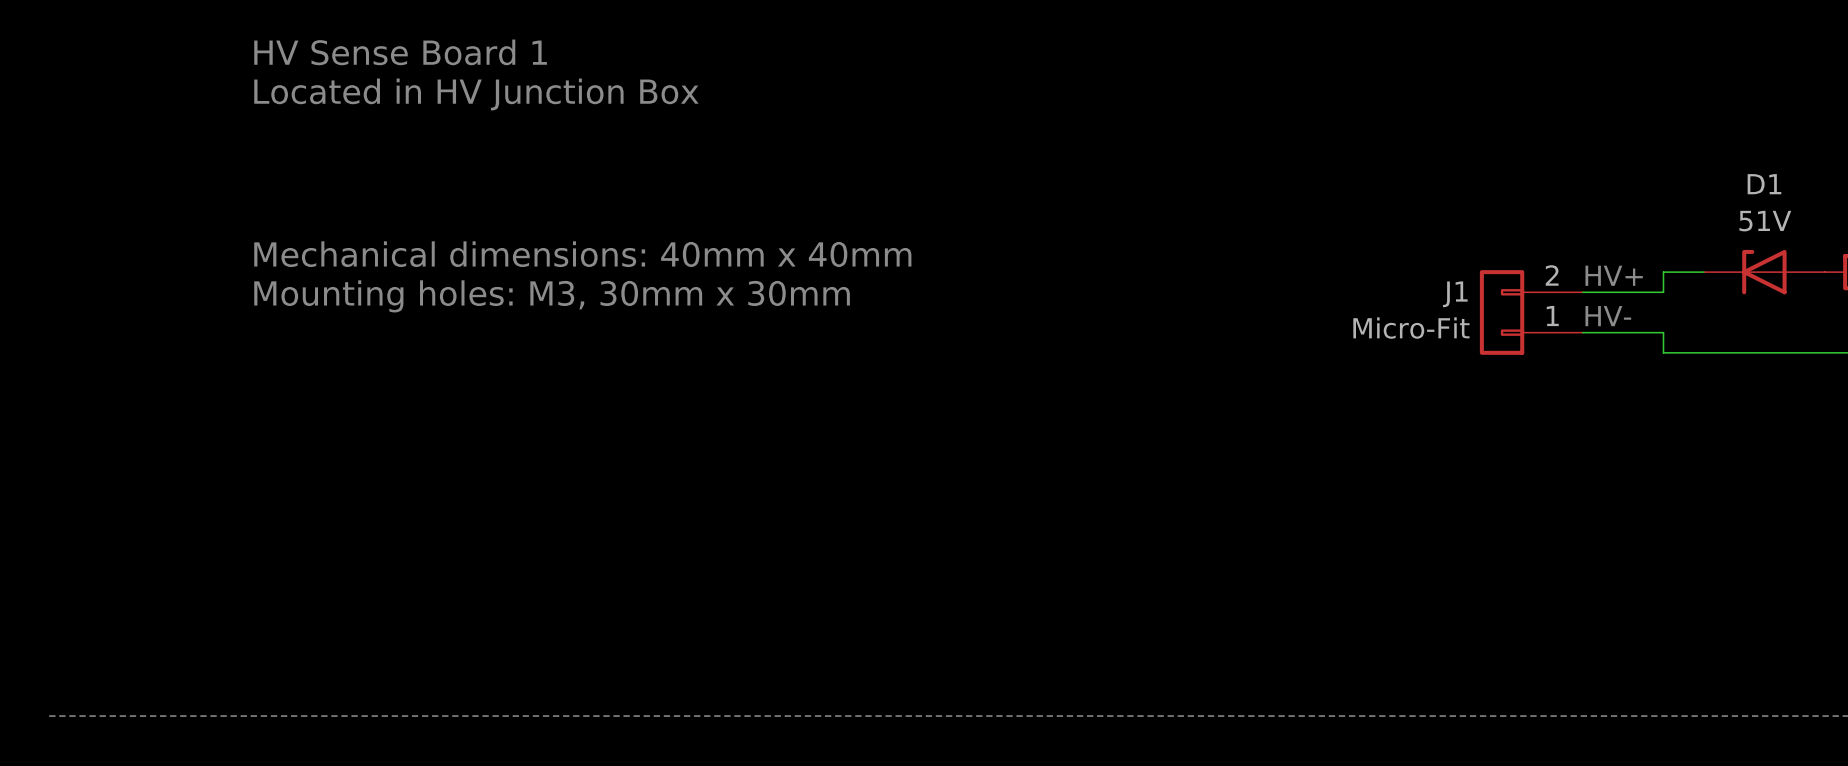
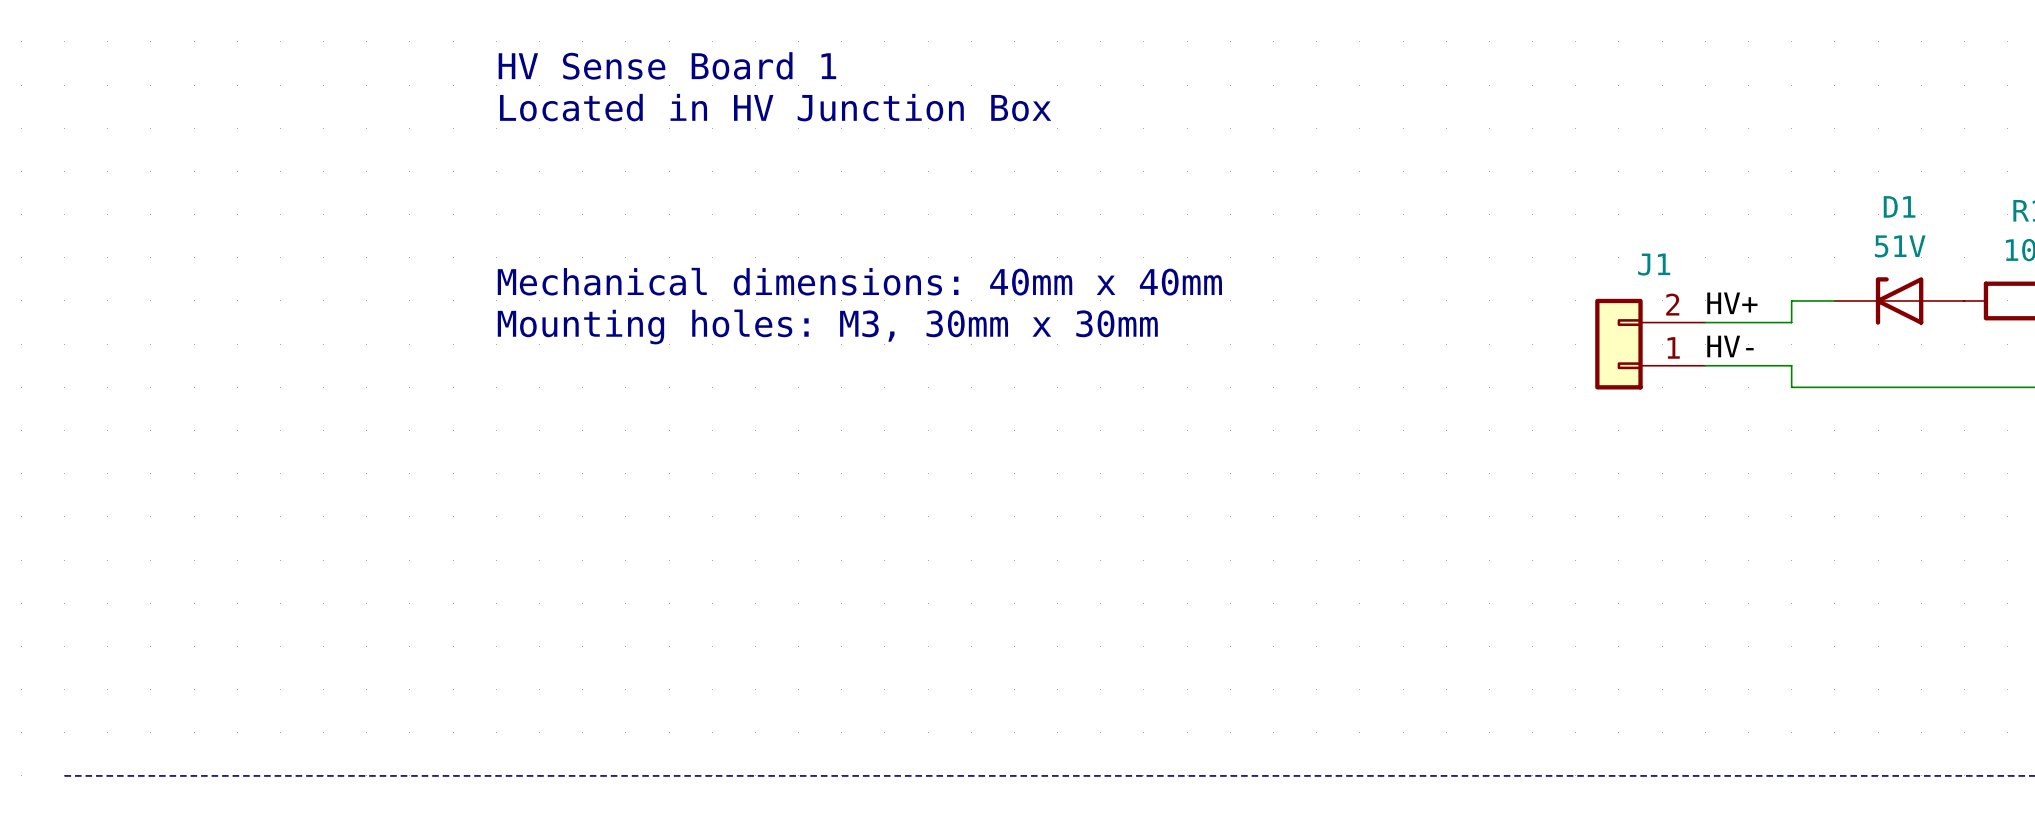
text position: HV Sense Board 1 (400, 52) -> HV Sense Board 1 (667, 65)
text position: Located in HV Junction Box (476, 94) -> Located in HV Junction Box (775, 107)
text position: Mechanical dimensions: 40mm x 40mm (582, 254) -> Mechanical dimensions: 40mm x 40mm (859, 281)
label: none -> HV+ (1732, 303)
text: HV+ (1614, 275) -> none
J1 name position: J1 (1455, 294) -> J1 (1654, 264)
text position: Mounting holes: M3, 30mm x 30mm (552, 296) -> Mounting holes: M3, 30mm x 30mm (827, 326)
label: none -> HV- (1730, 346)
text: HV- (1608, 316) -> none
J1 value: Micro-Fit (1411, 328) -> none

